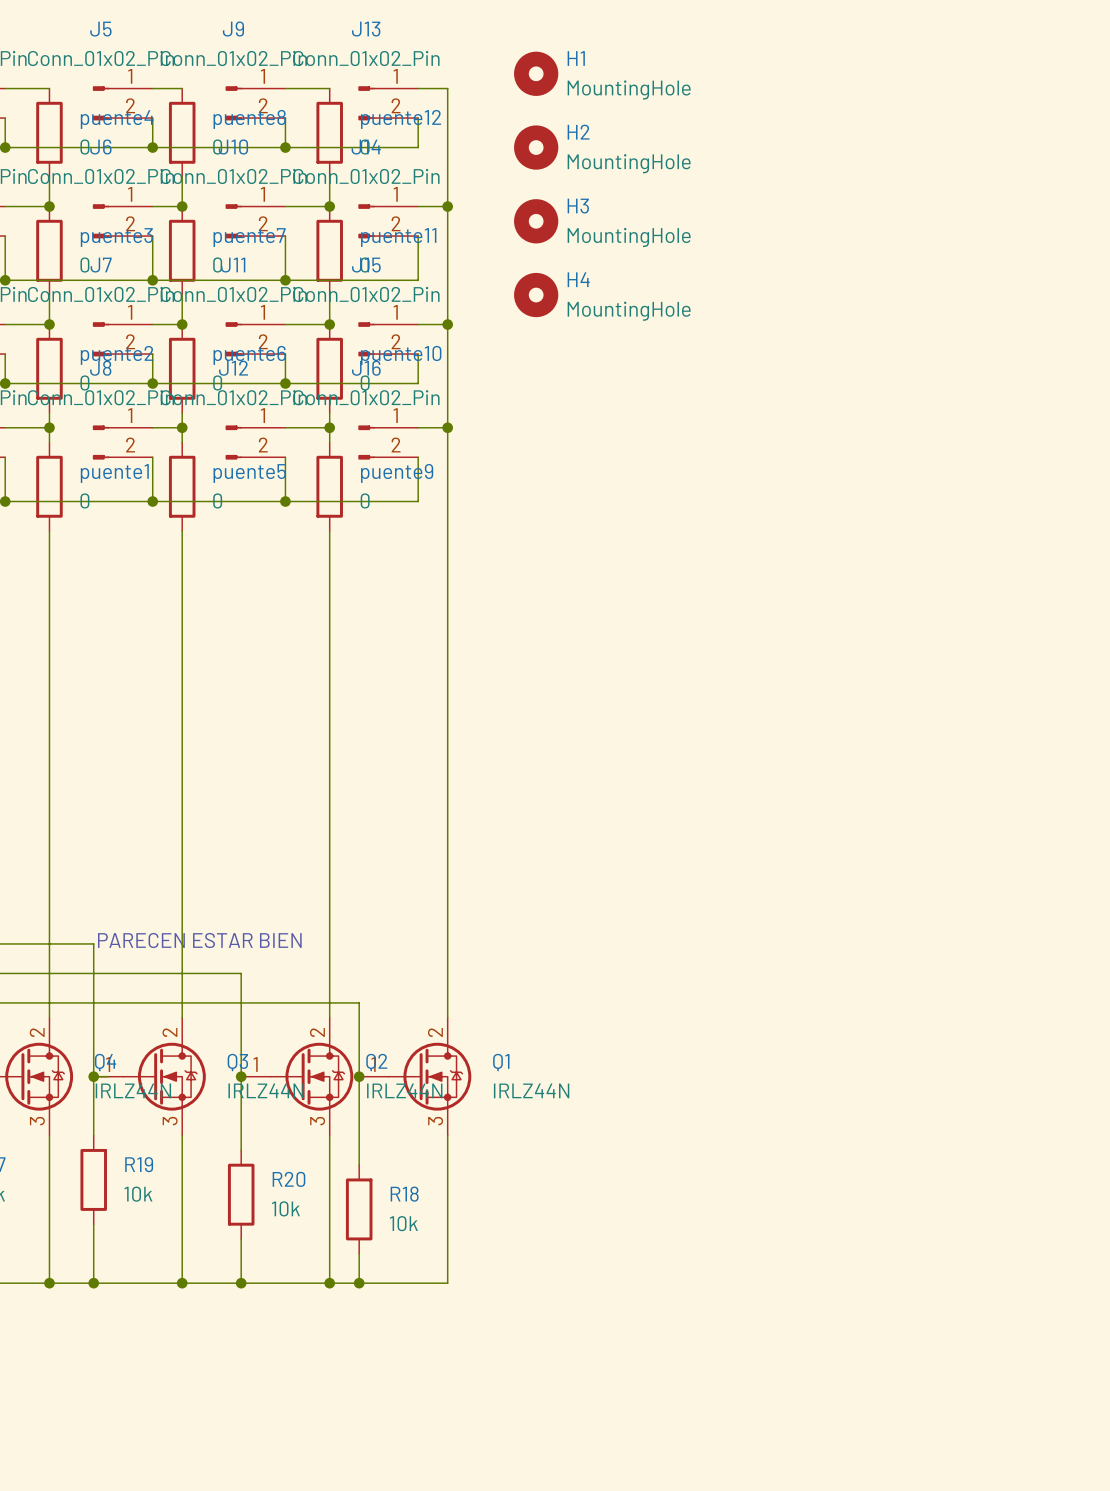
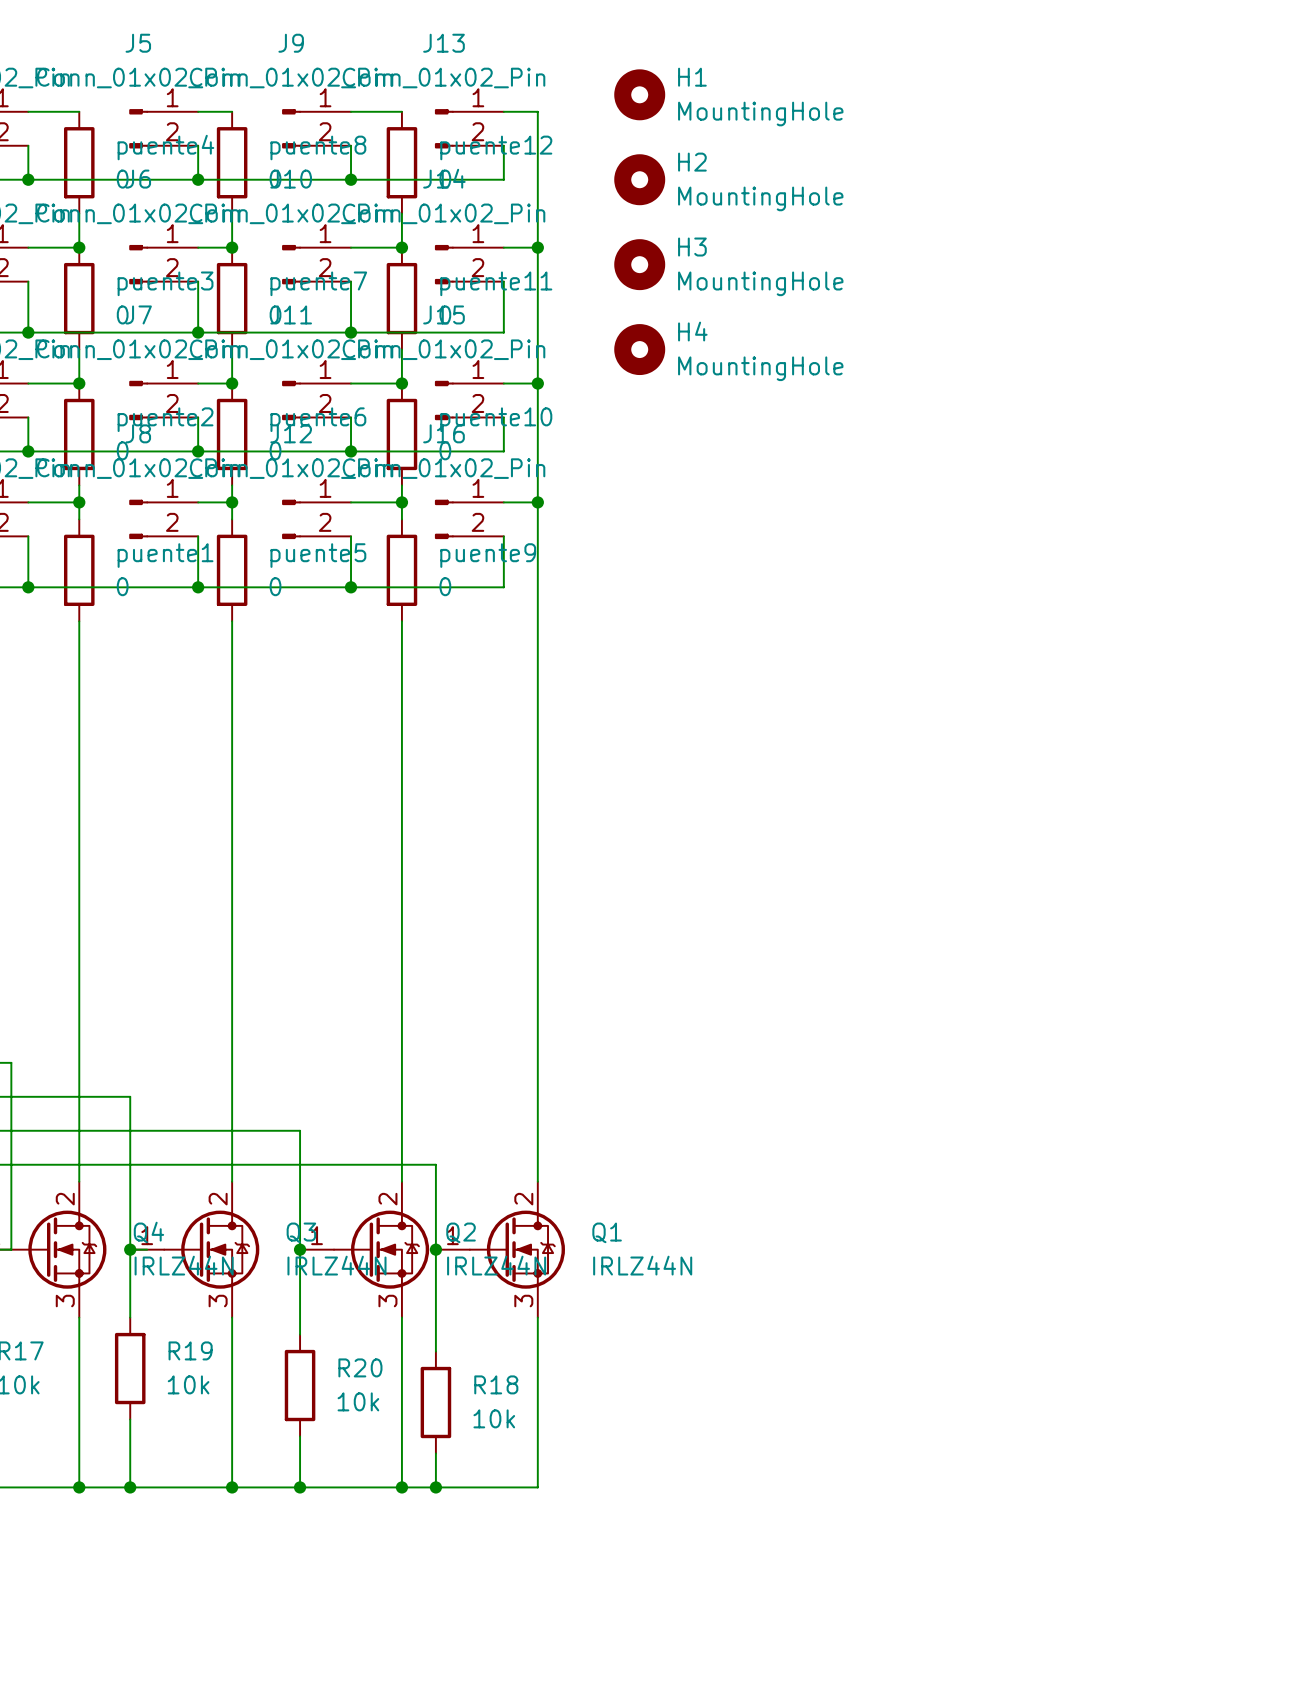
text: PARECEN ESTAR BIEN (199, 940) -> none

